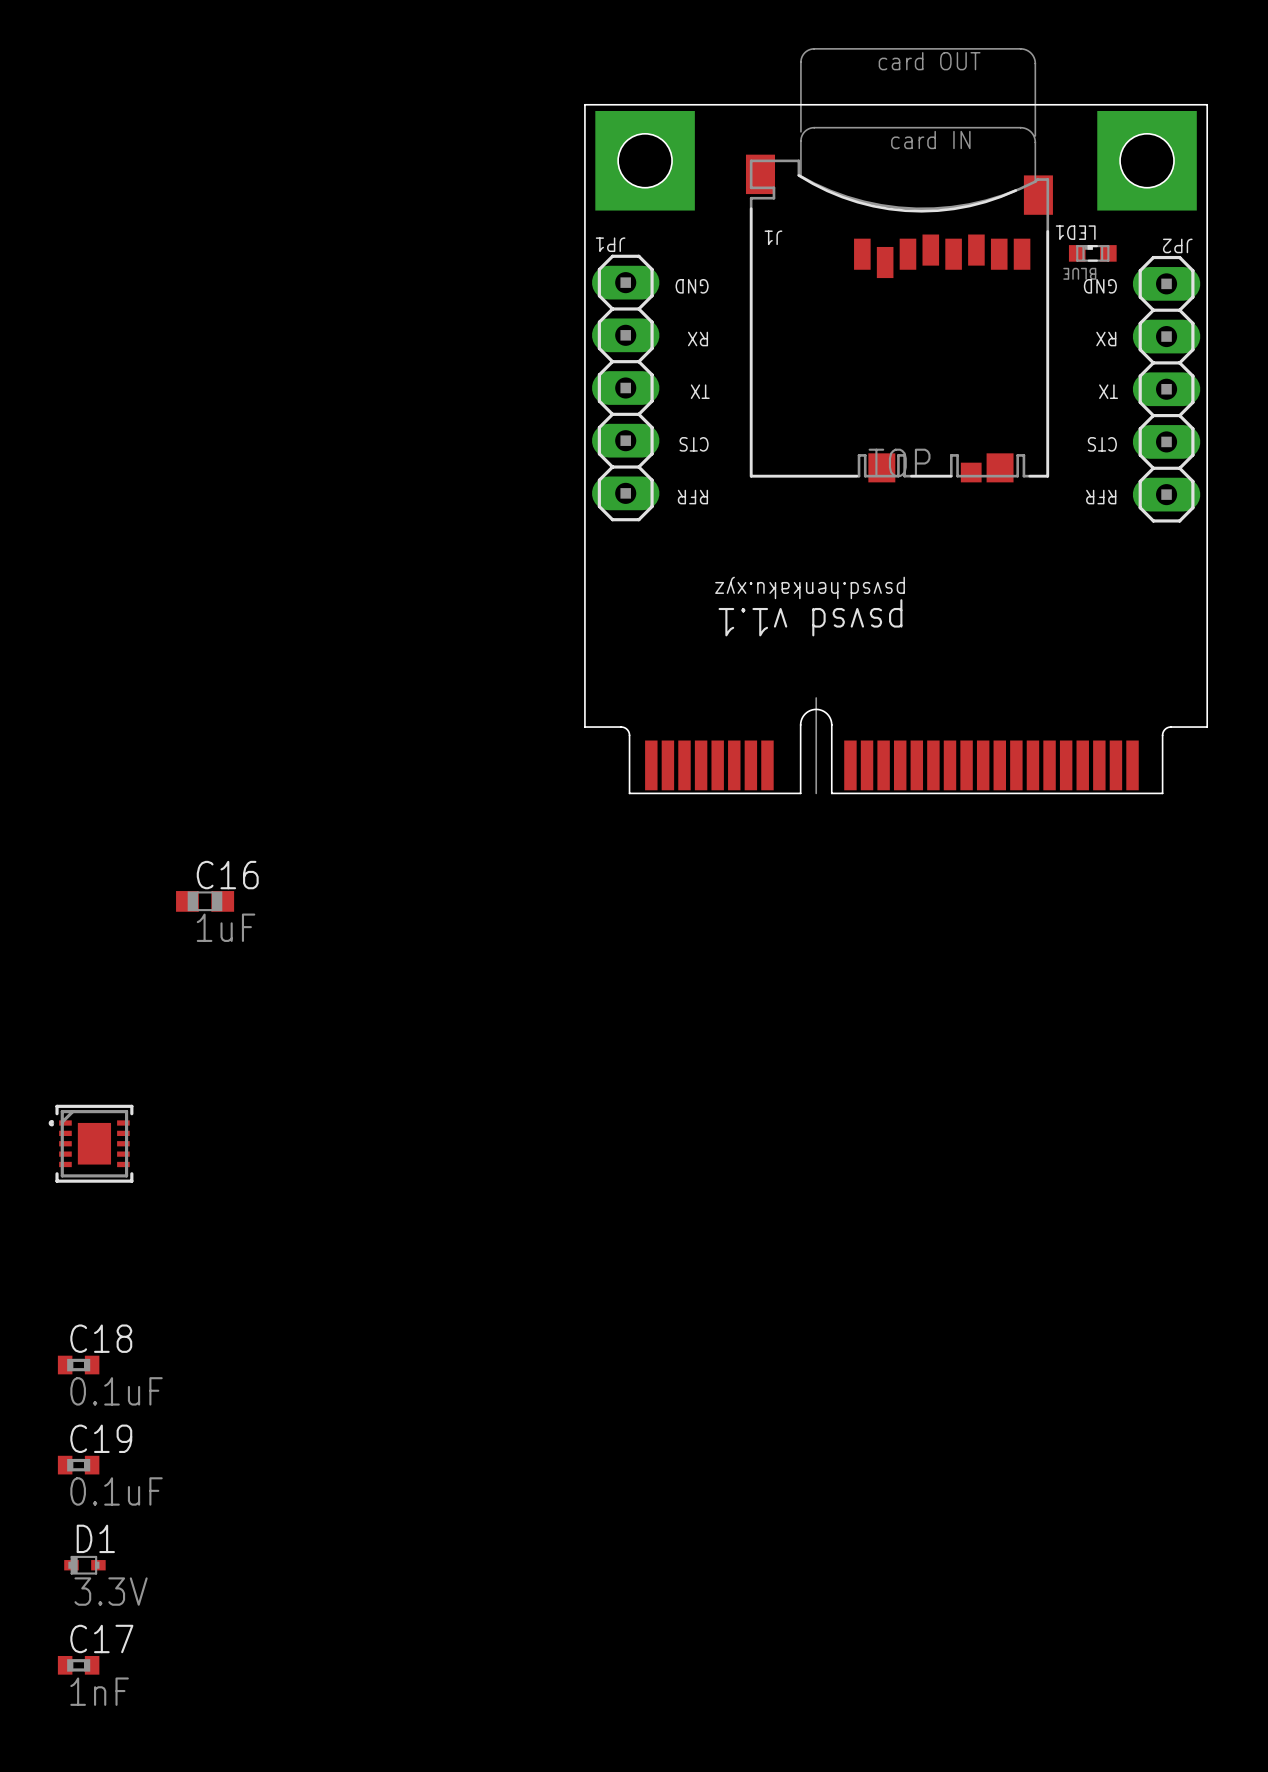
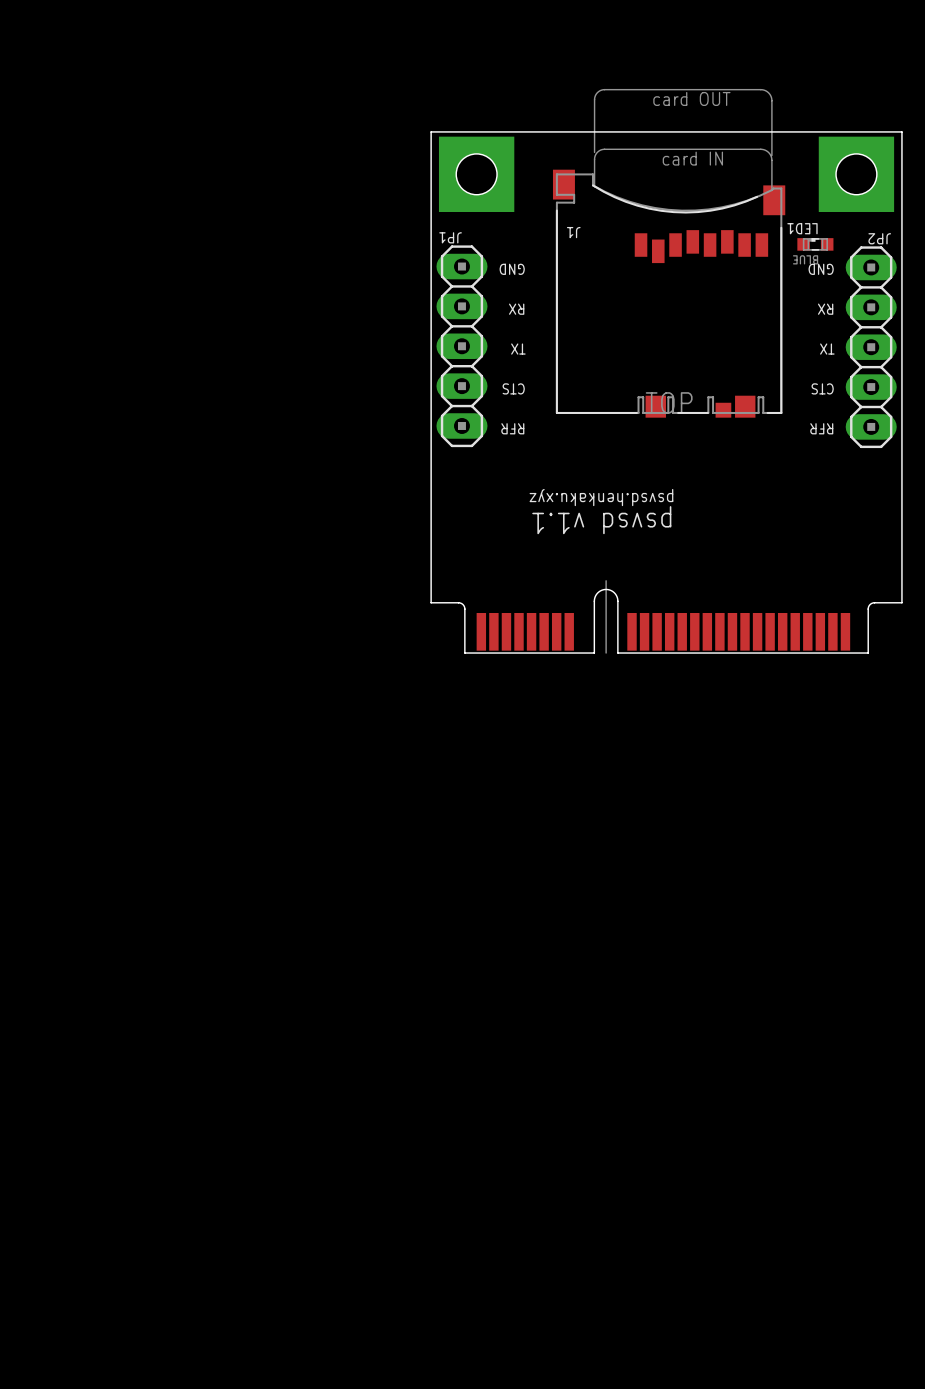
C16: 1uF (205, 901) -> none
part: (91, 1143) -> none
C18: 0.1uF (78, 1365) -> none
C19: 0.1uF (78, 1465) -> none
D1: 3.3V (84, 1565) -> none
C17: 1nF (78, 1665) -> none

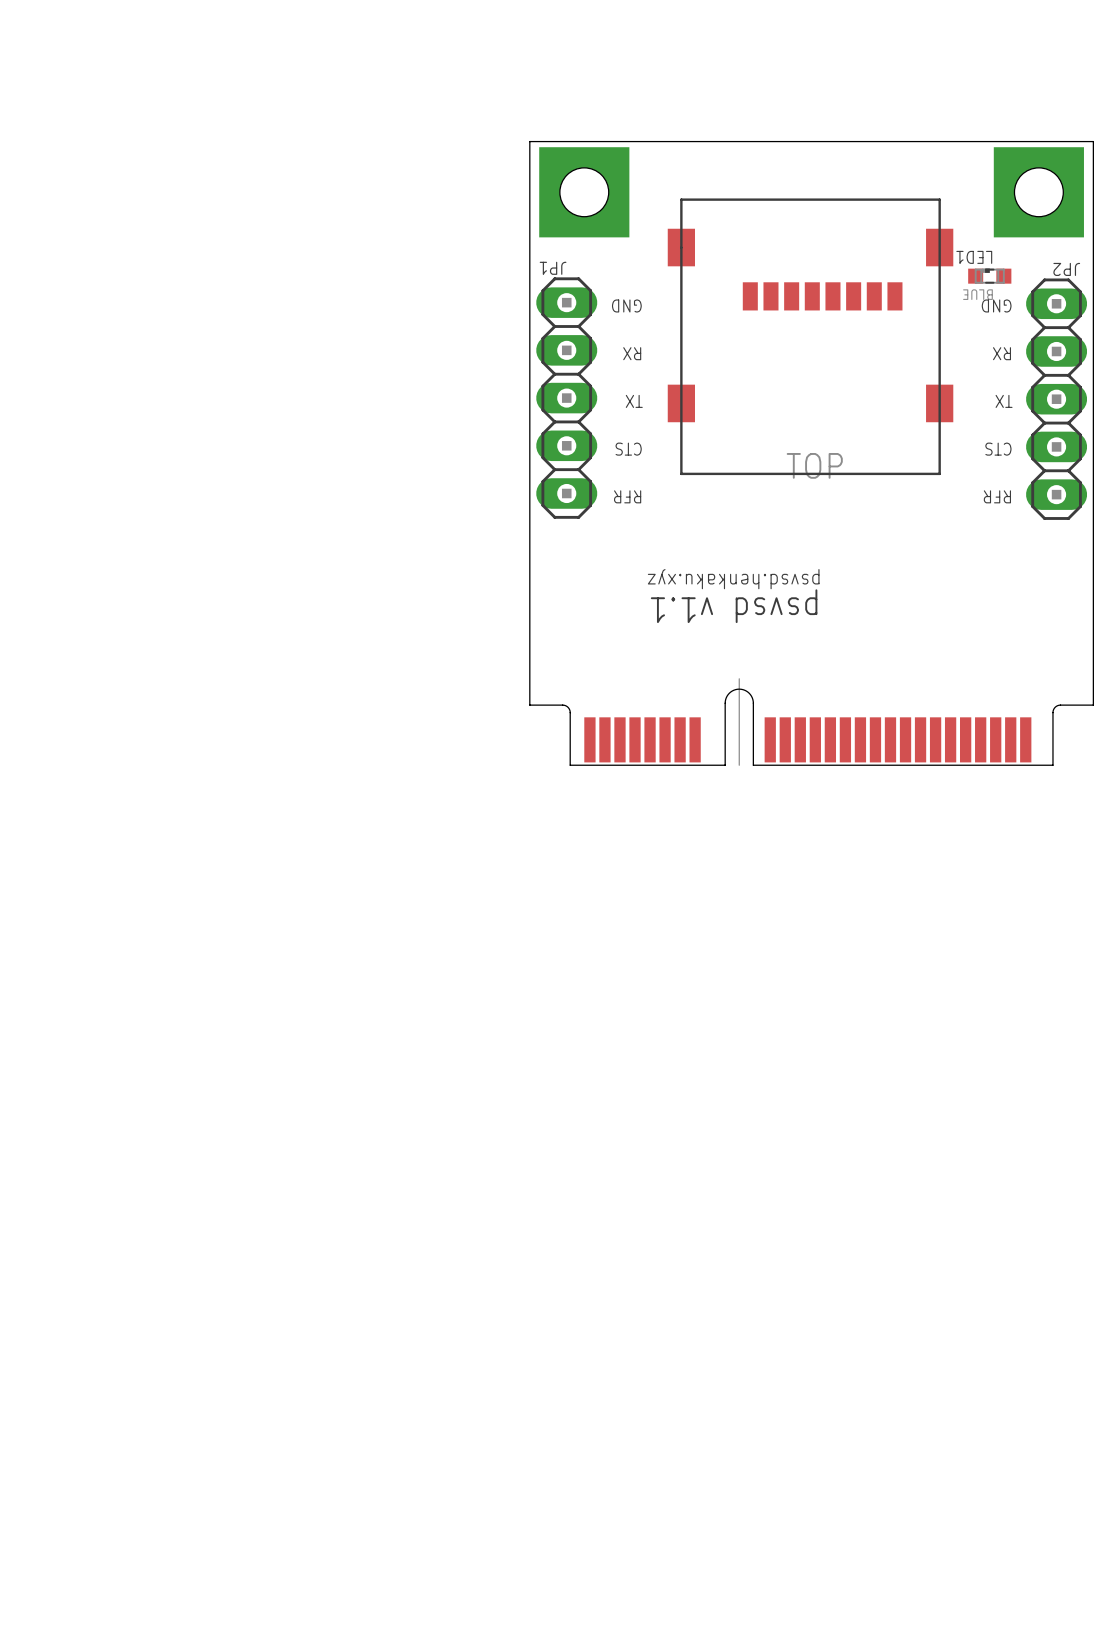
J1: (669, 253) -> none
part: none -> (810, 336)

